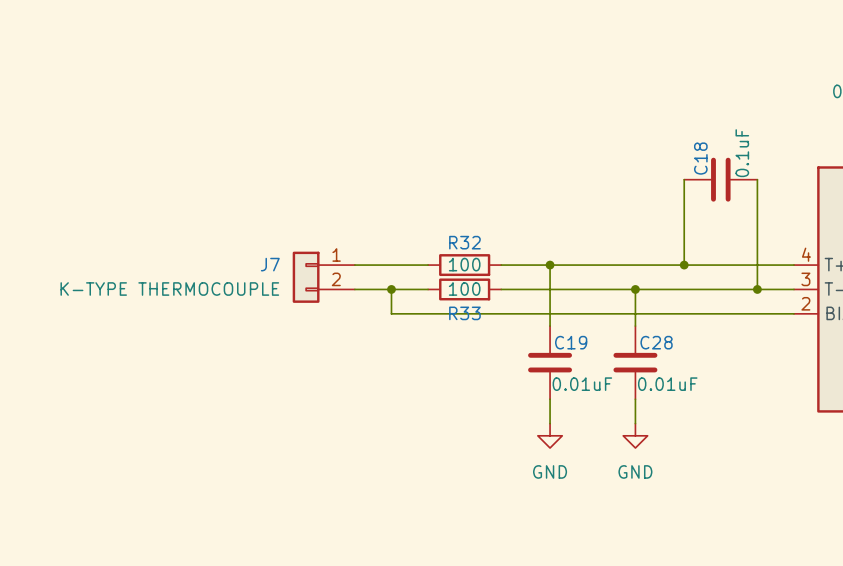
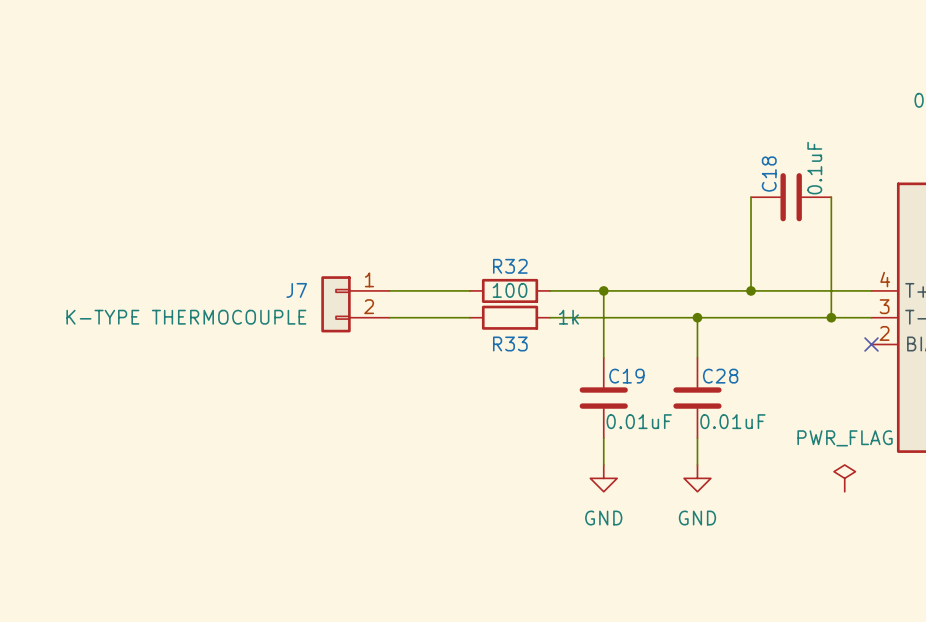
wire: (391, 289) (391, 313) (793, 313) -> none
junction: (391, 289) -> none
R33 value: 100 (464, 289) -> 1k (568, 317)
no-connect mark: none -> (871, 344)
power symbol: none -> PWR_FLAG (844, 478)

